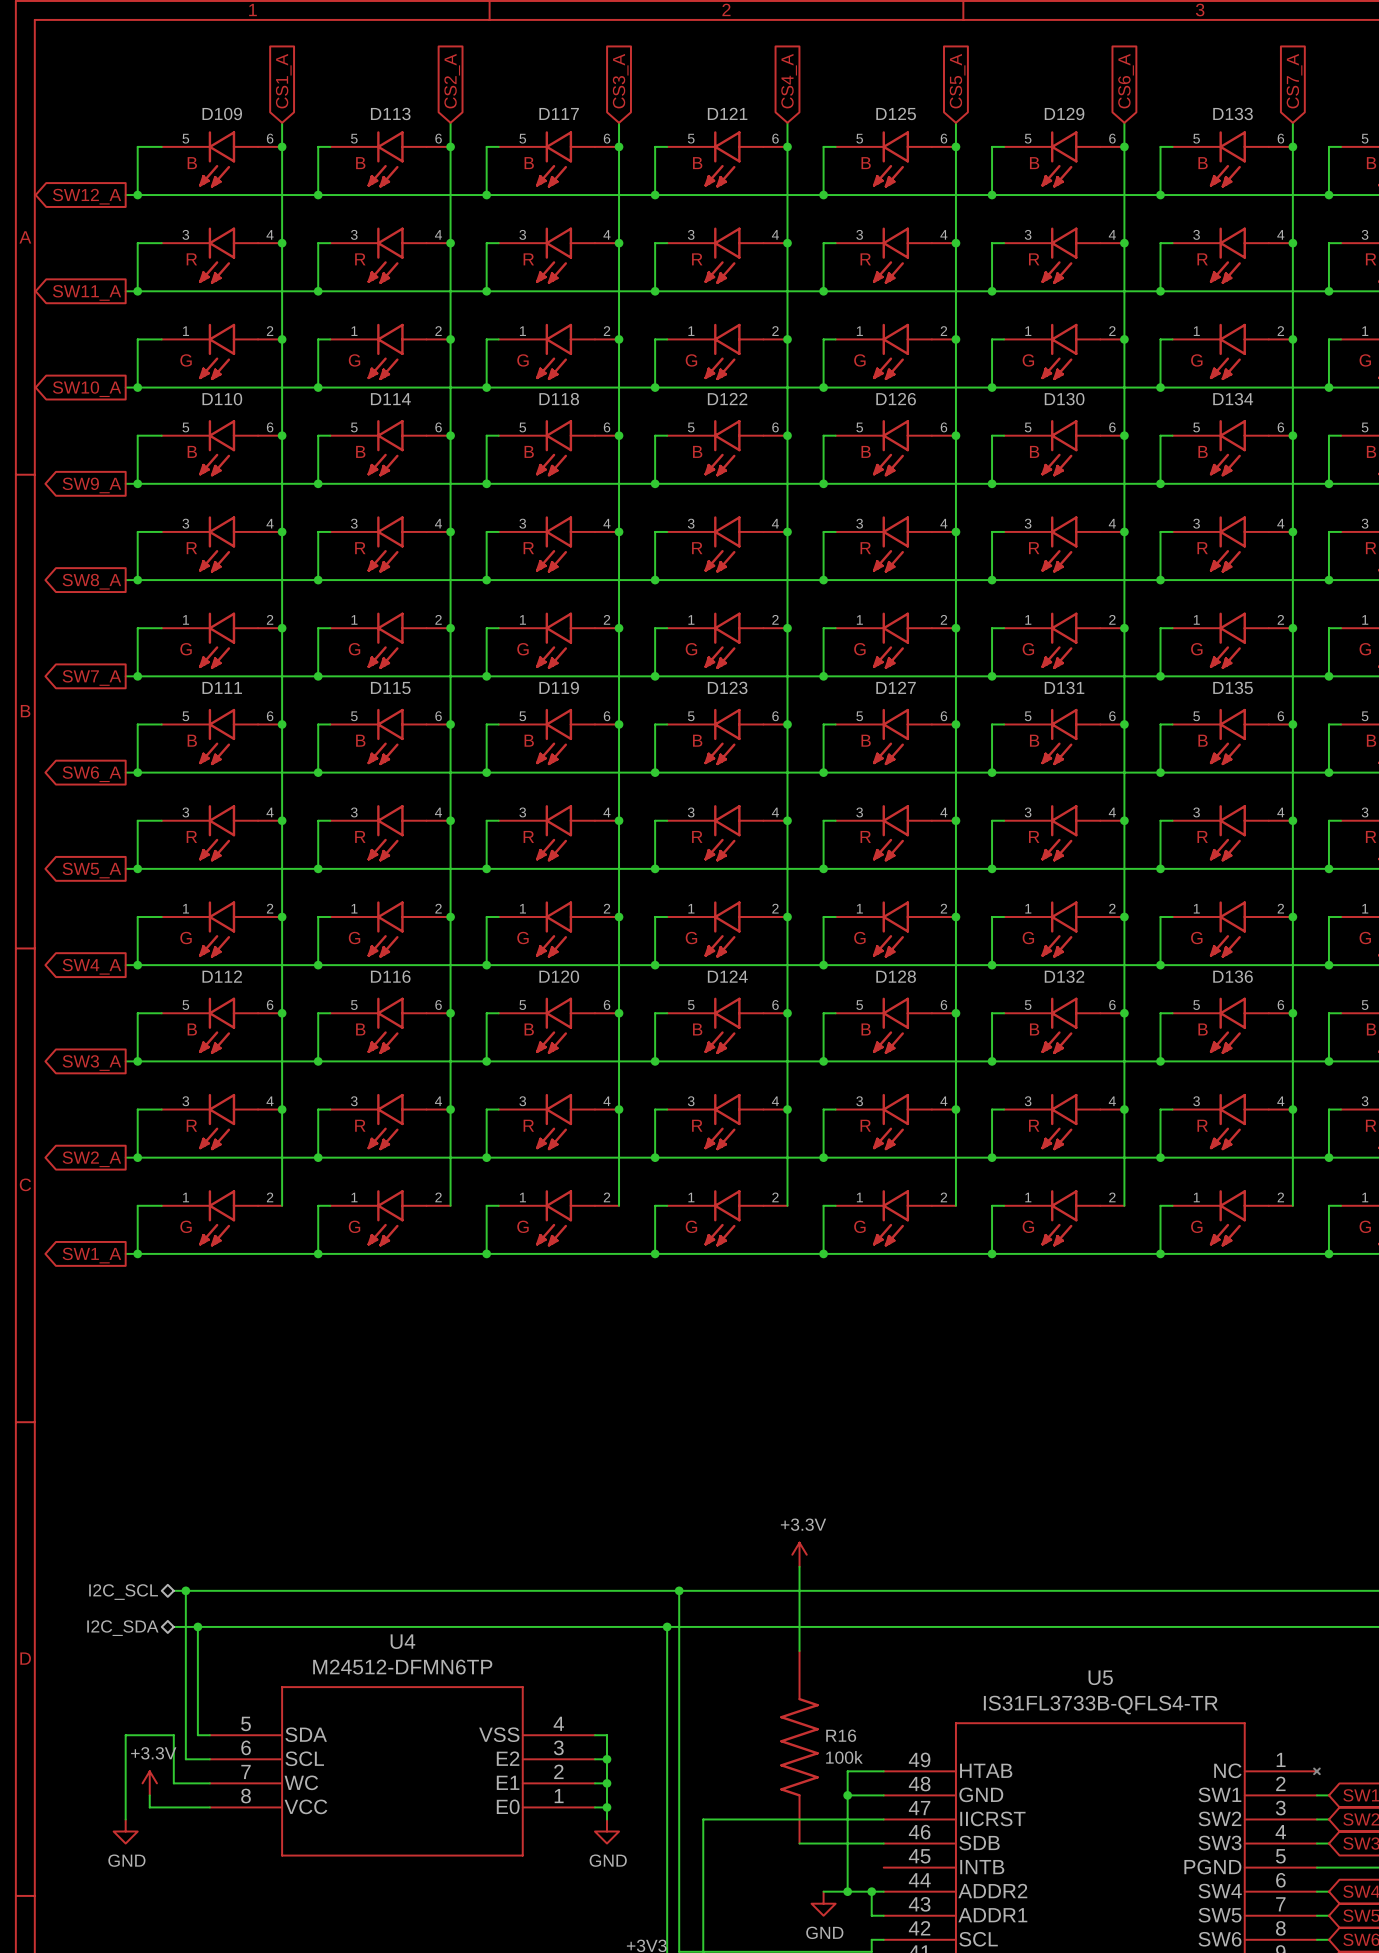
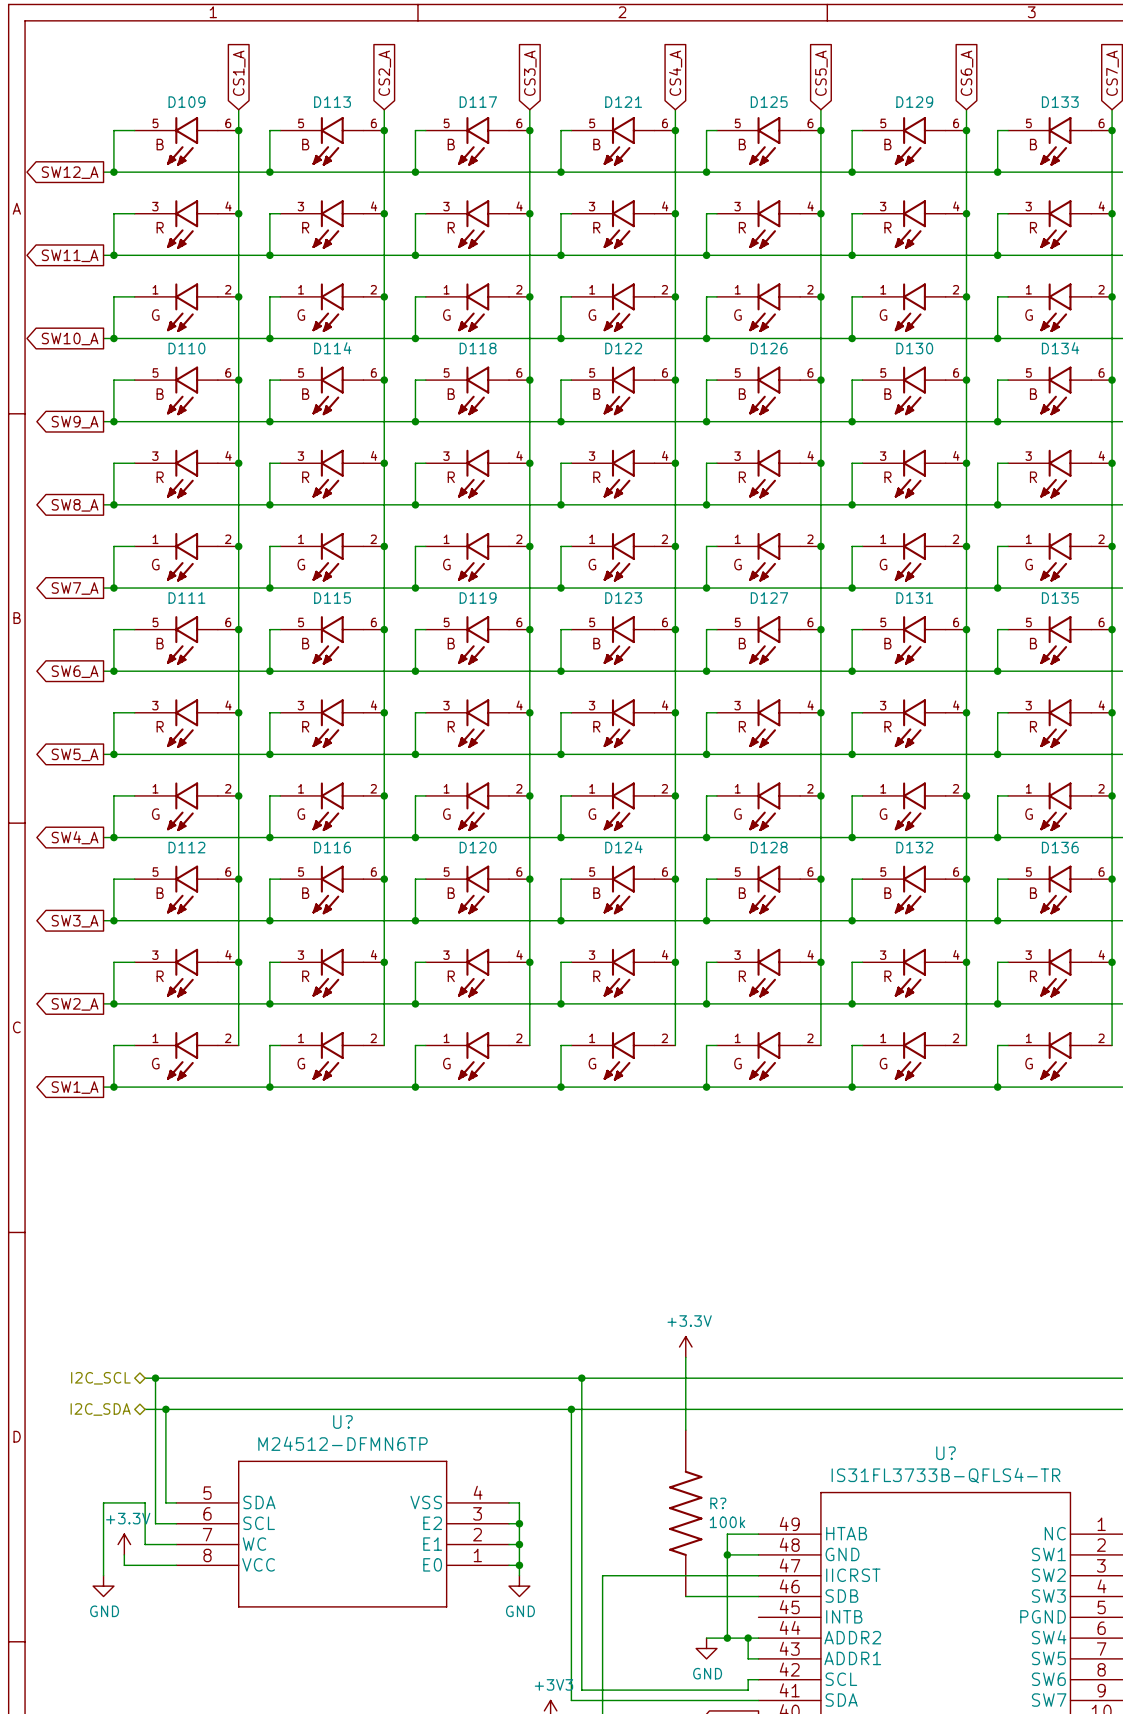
U4 name: U4 (402, 1641) -> U? (342, 1422)
U5 name: U5 (1100, 1677) -> U? (945, 1453)
R16 name: R16 (841, 1735) -> R? (718, 1503)

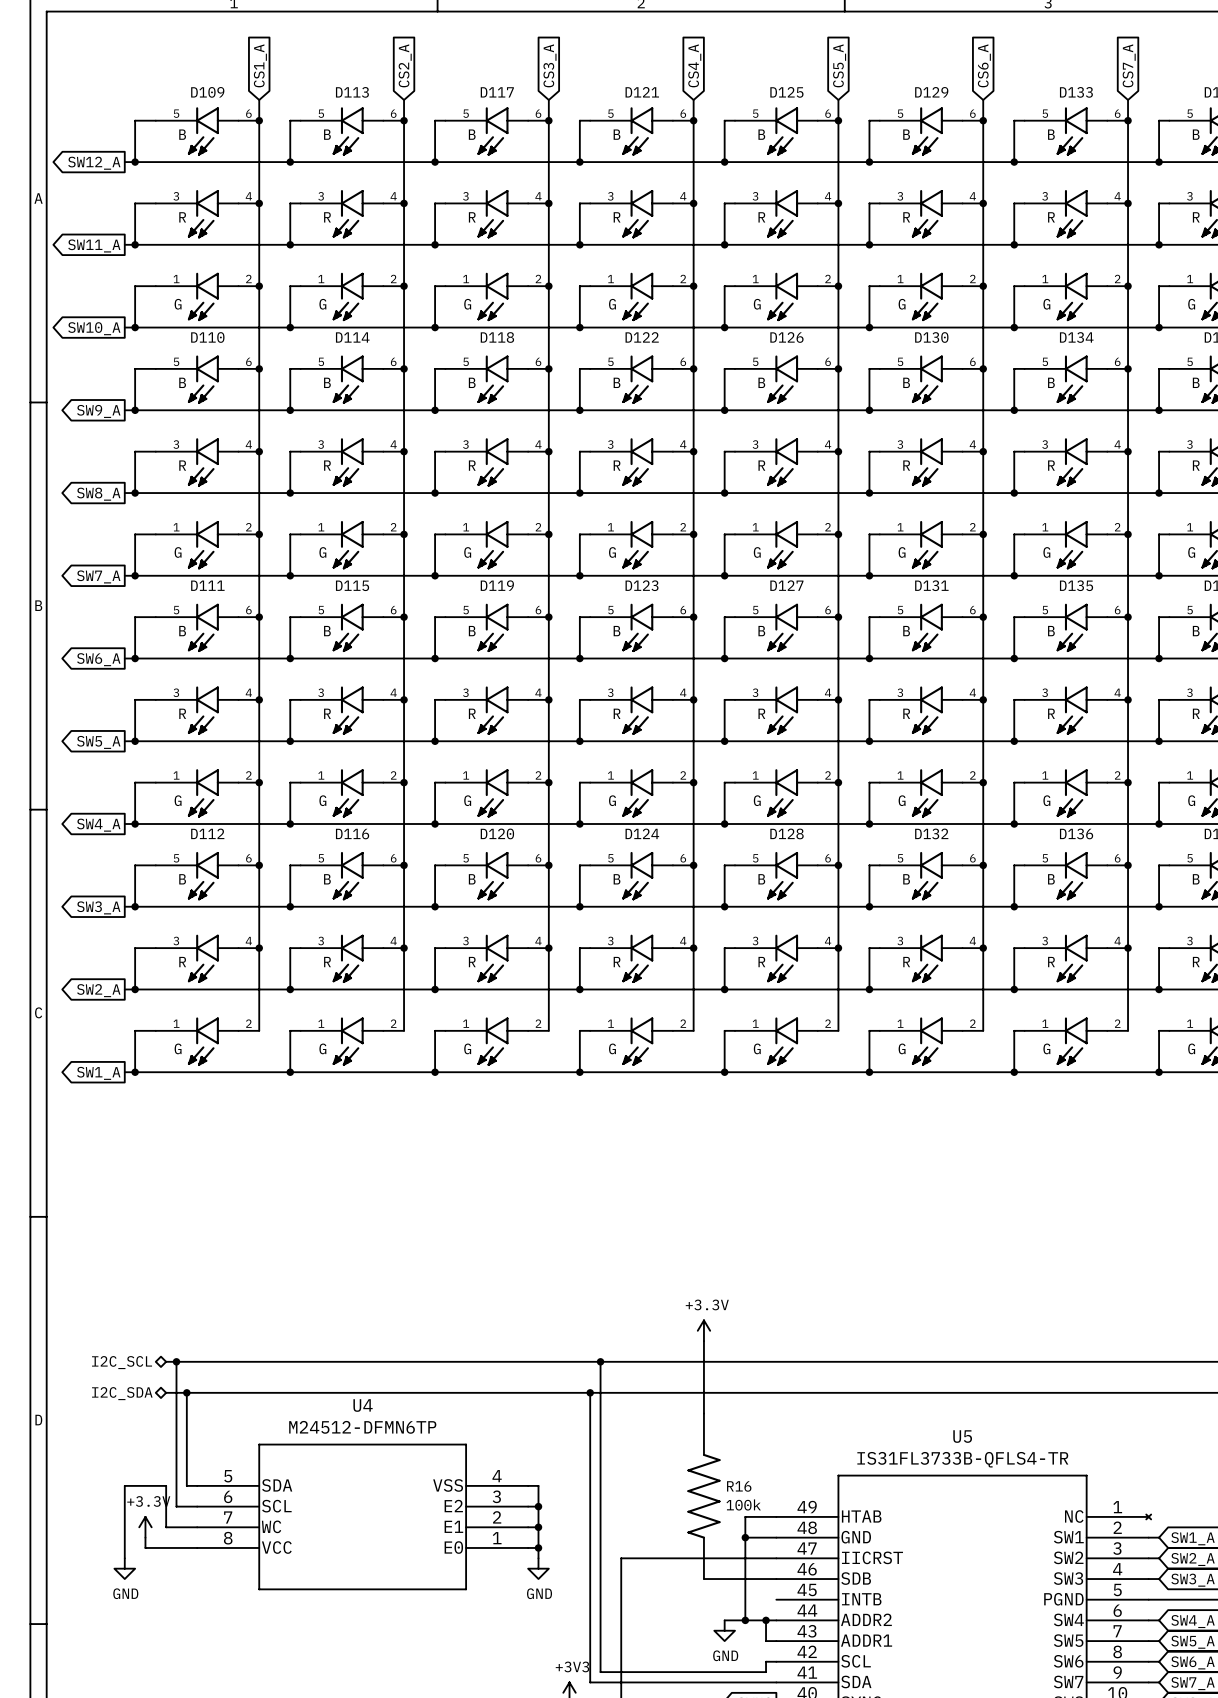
U? name: U? (342, 1422) -> U4 (363, 1405)
U? name: U? (945, 1453) -> U5 (962, 1436)
R? name: R? (718, 1503) -> R16 (739, 1486)

